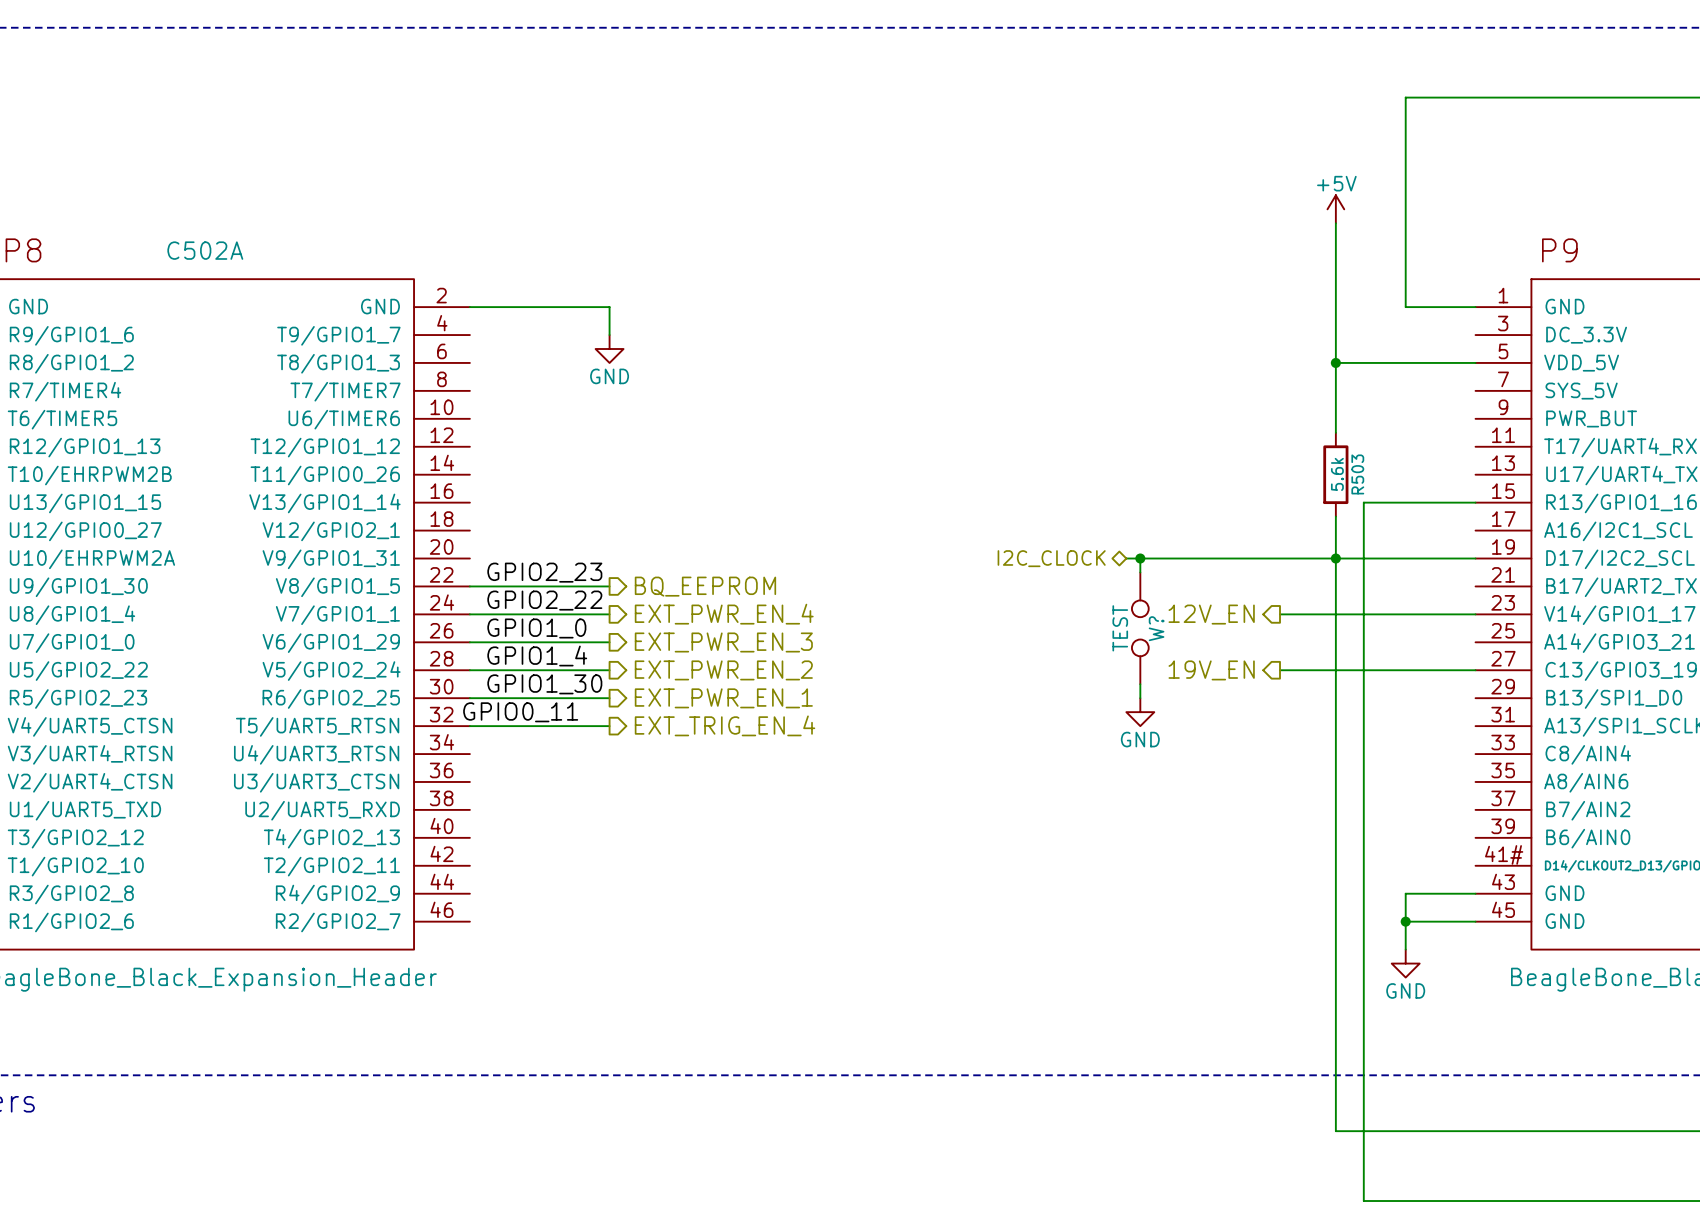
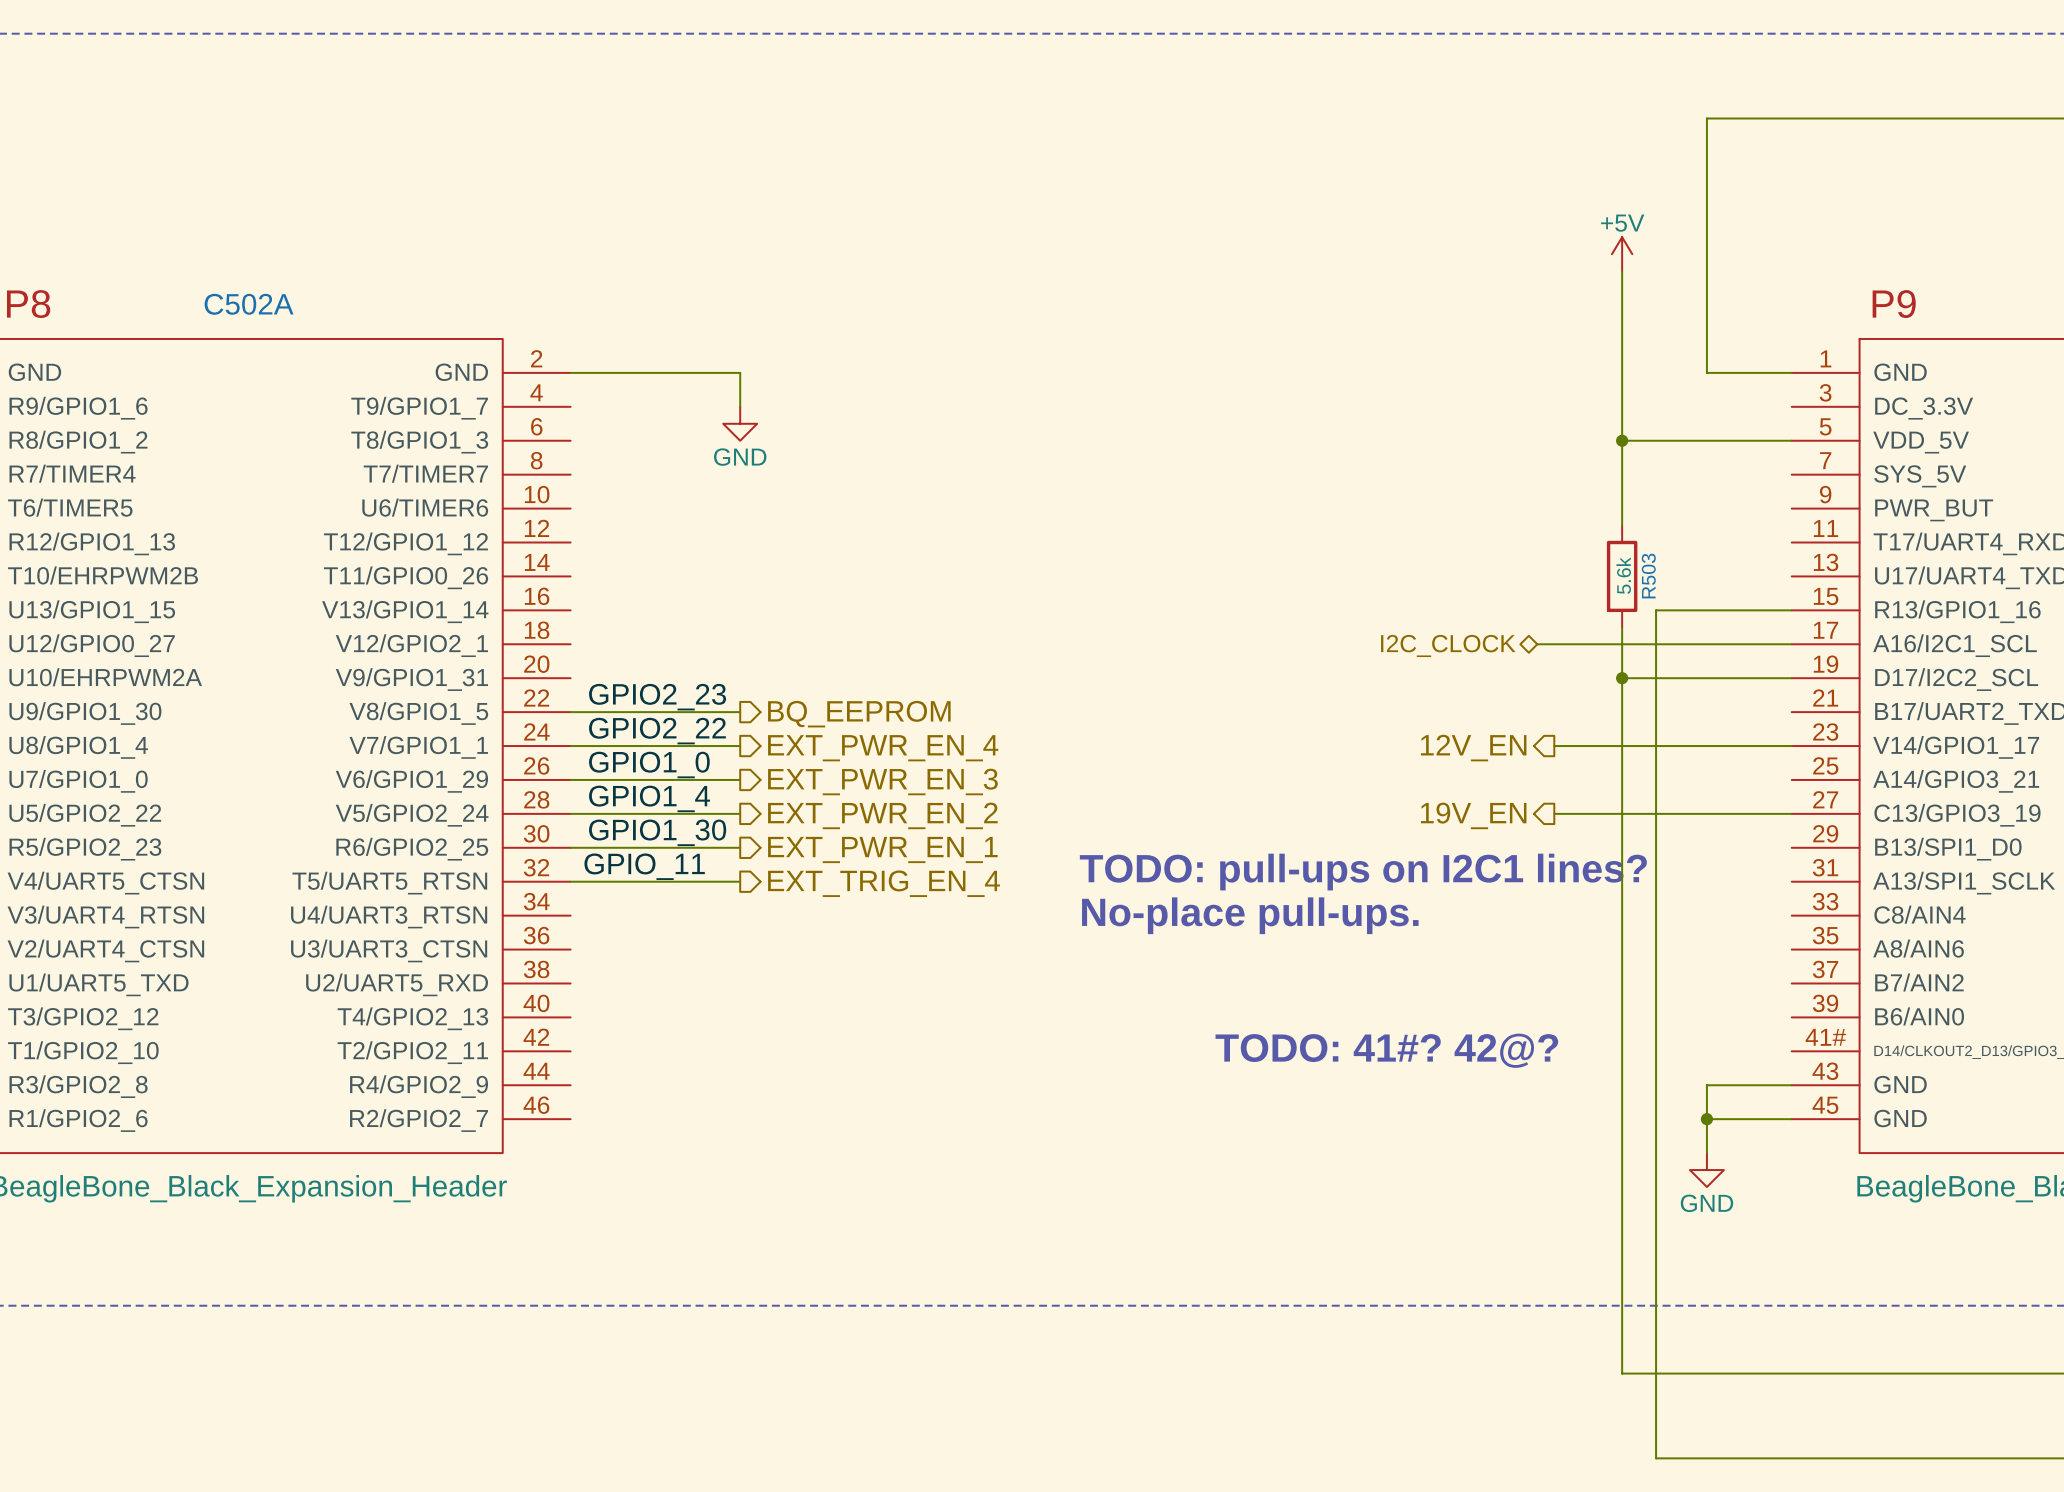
hierarchical label position: I2C_CLOCK (1051, 558) -> I2C_CLOCK (1448, 645)
wire: (1126, 558) (1335, 558) -> (1537, 644) (1791, 644)
wire: (1140, 558) (1140, 572) -> none
junction: (1140, 558) -> none
W?: TEST (1140, 628) -> none
wire: (1140, 684) (1140, 698) -> none
label: GPIO0_11 (520, 712) -> GPIO_11 (644, 866)
power symbol: GND (1140, 712) -> none
text: none -> TODO: pull-ups on I2C1 lines? (1363, 872)
text: none -> No-place pull-ups. (1250, 915)
text: none -> TODO: 41#? 42@? (1386, 1050)

